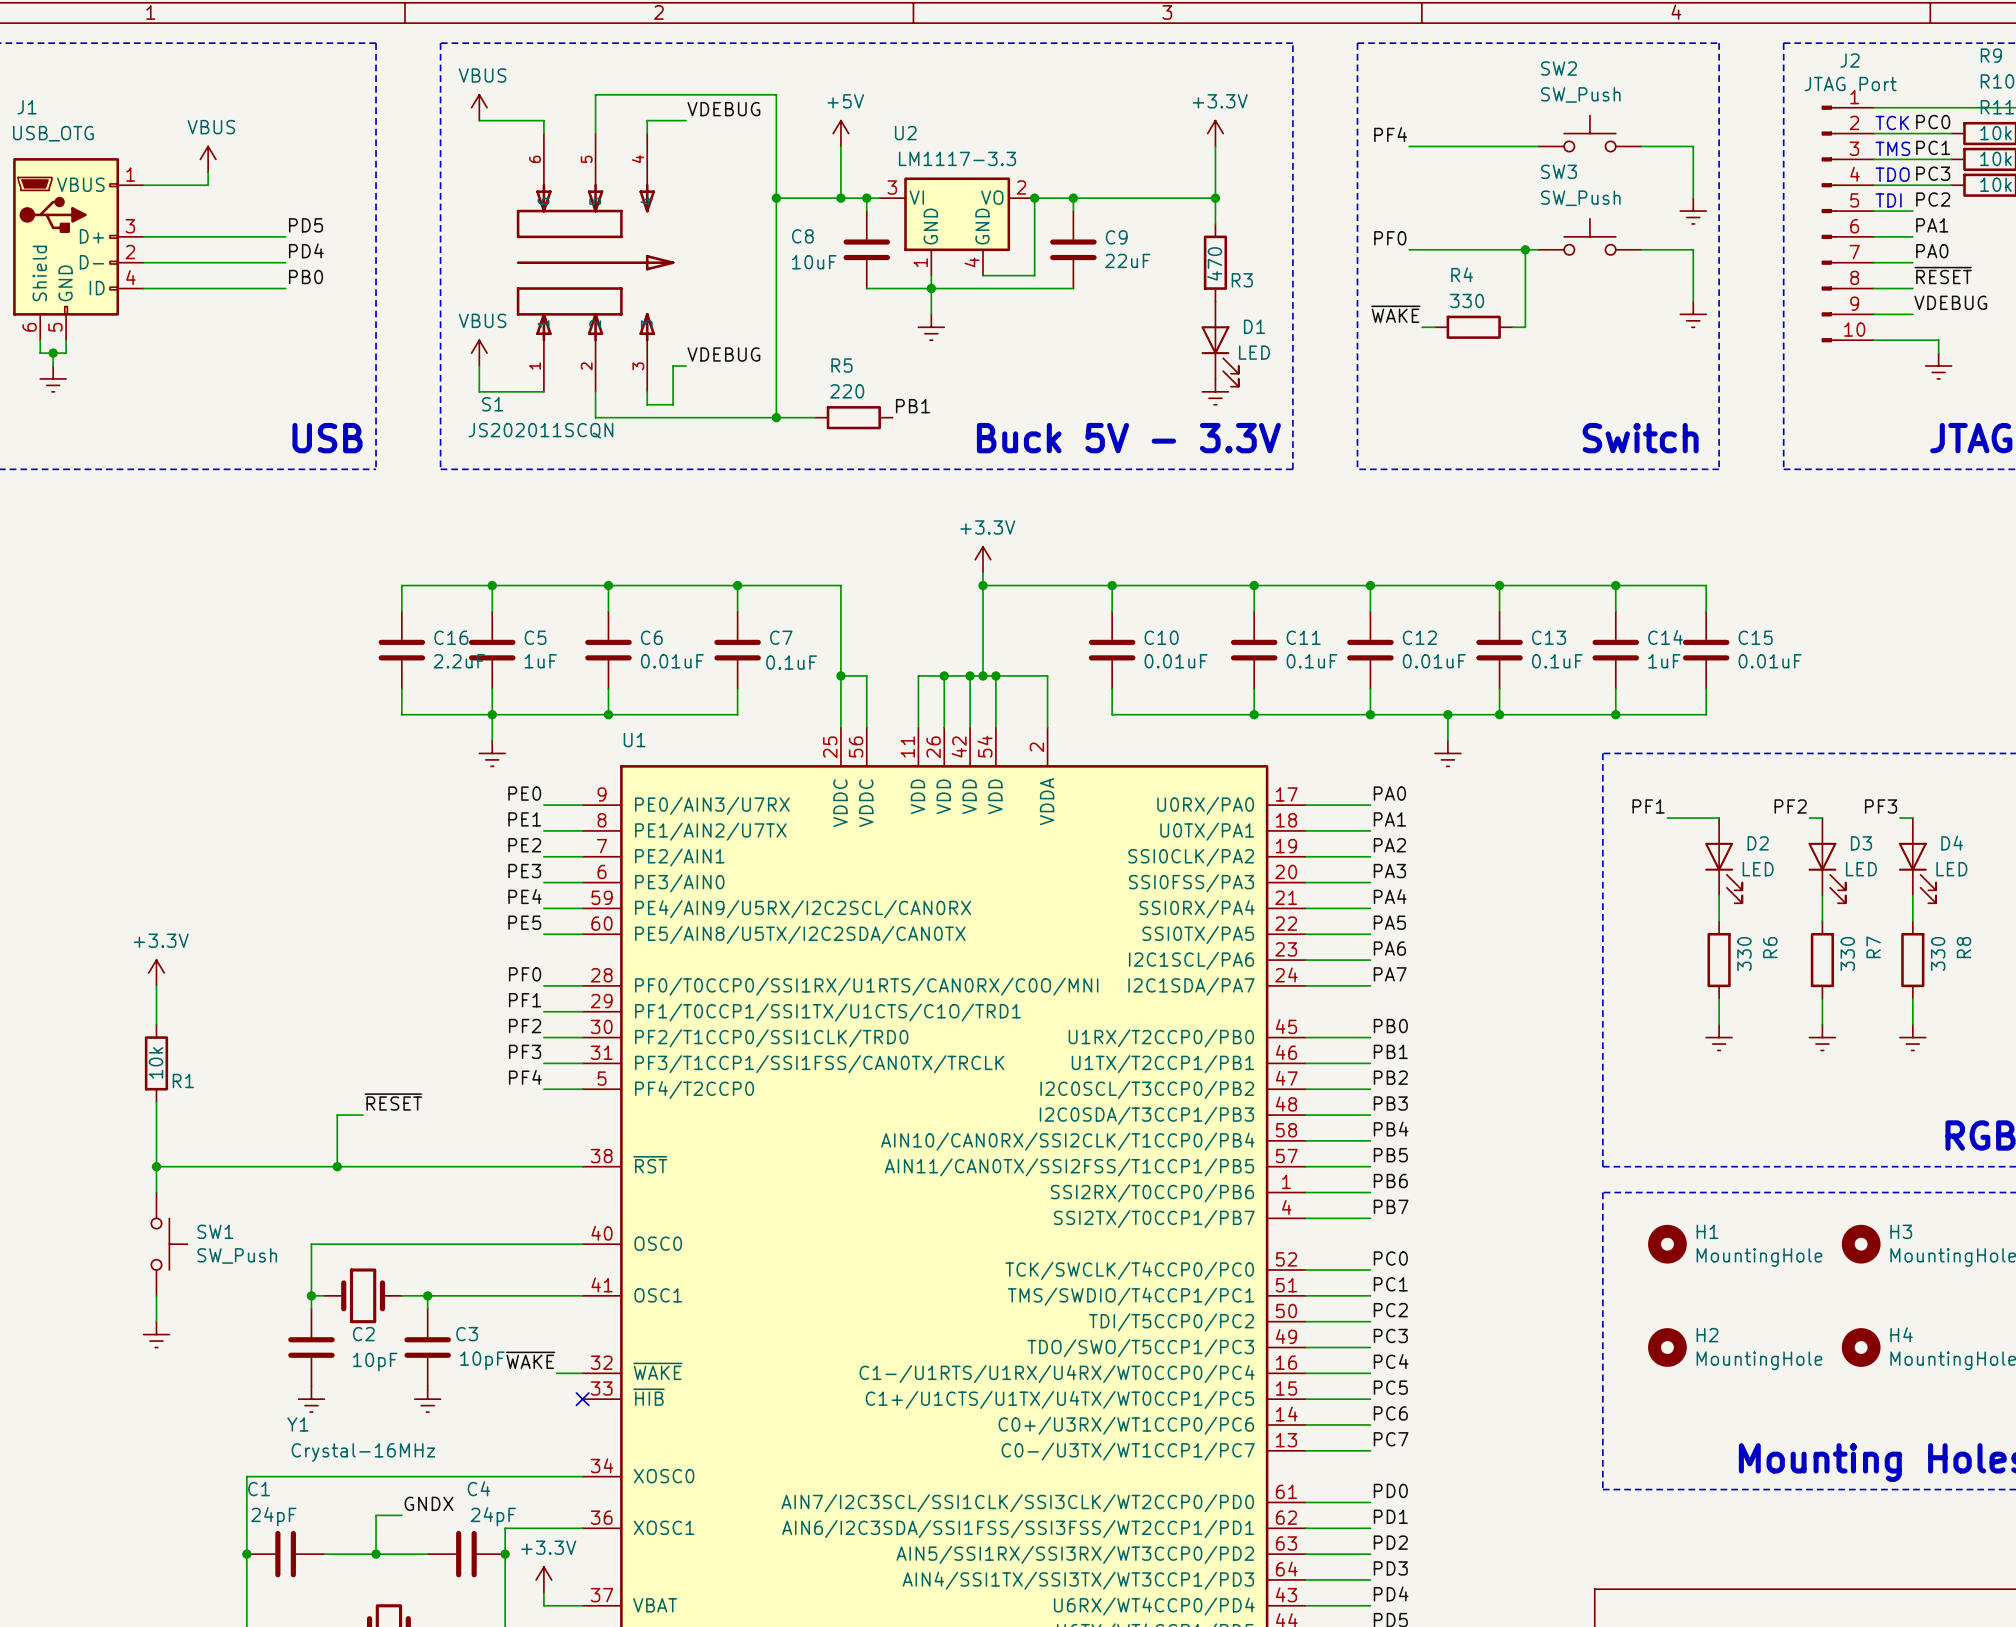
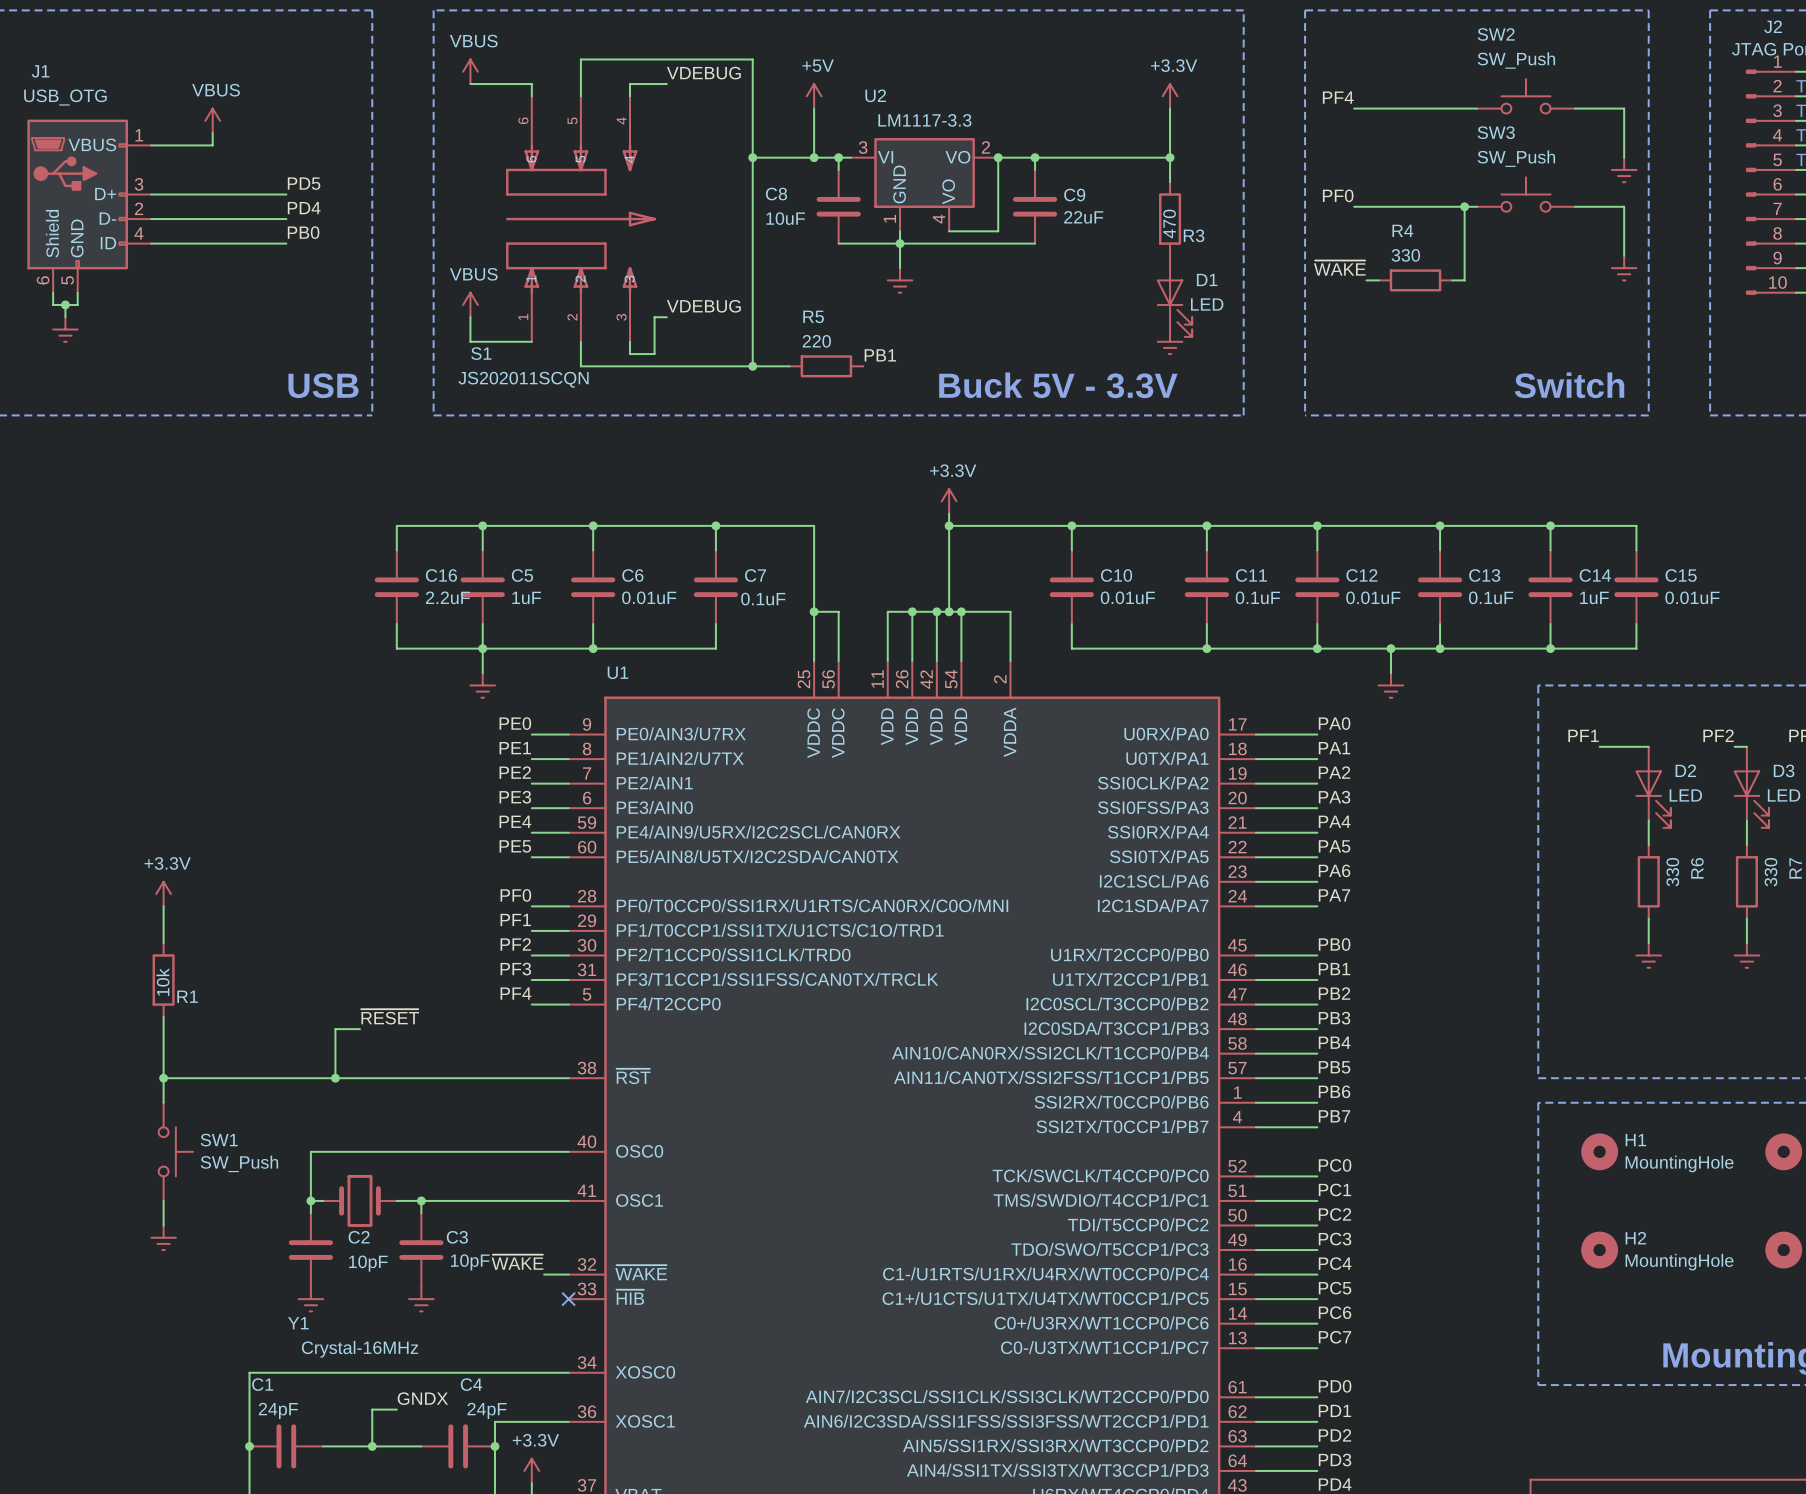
U2 pin name: GND (982, 226) -> VO (948, 191)

